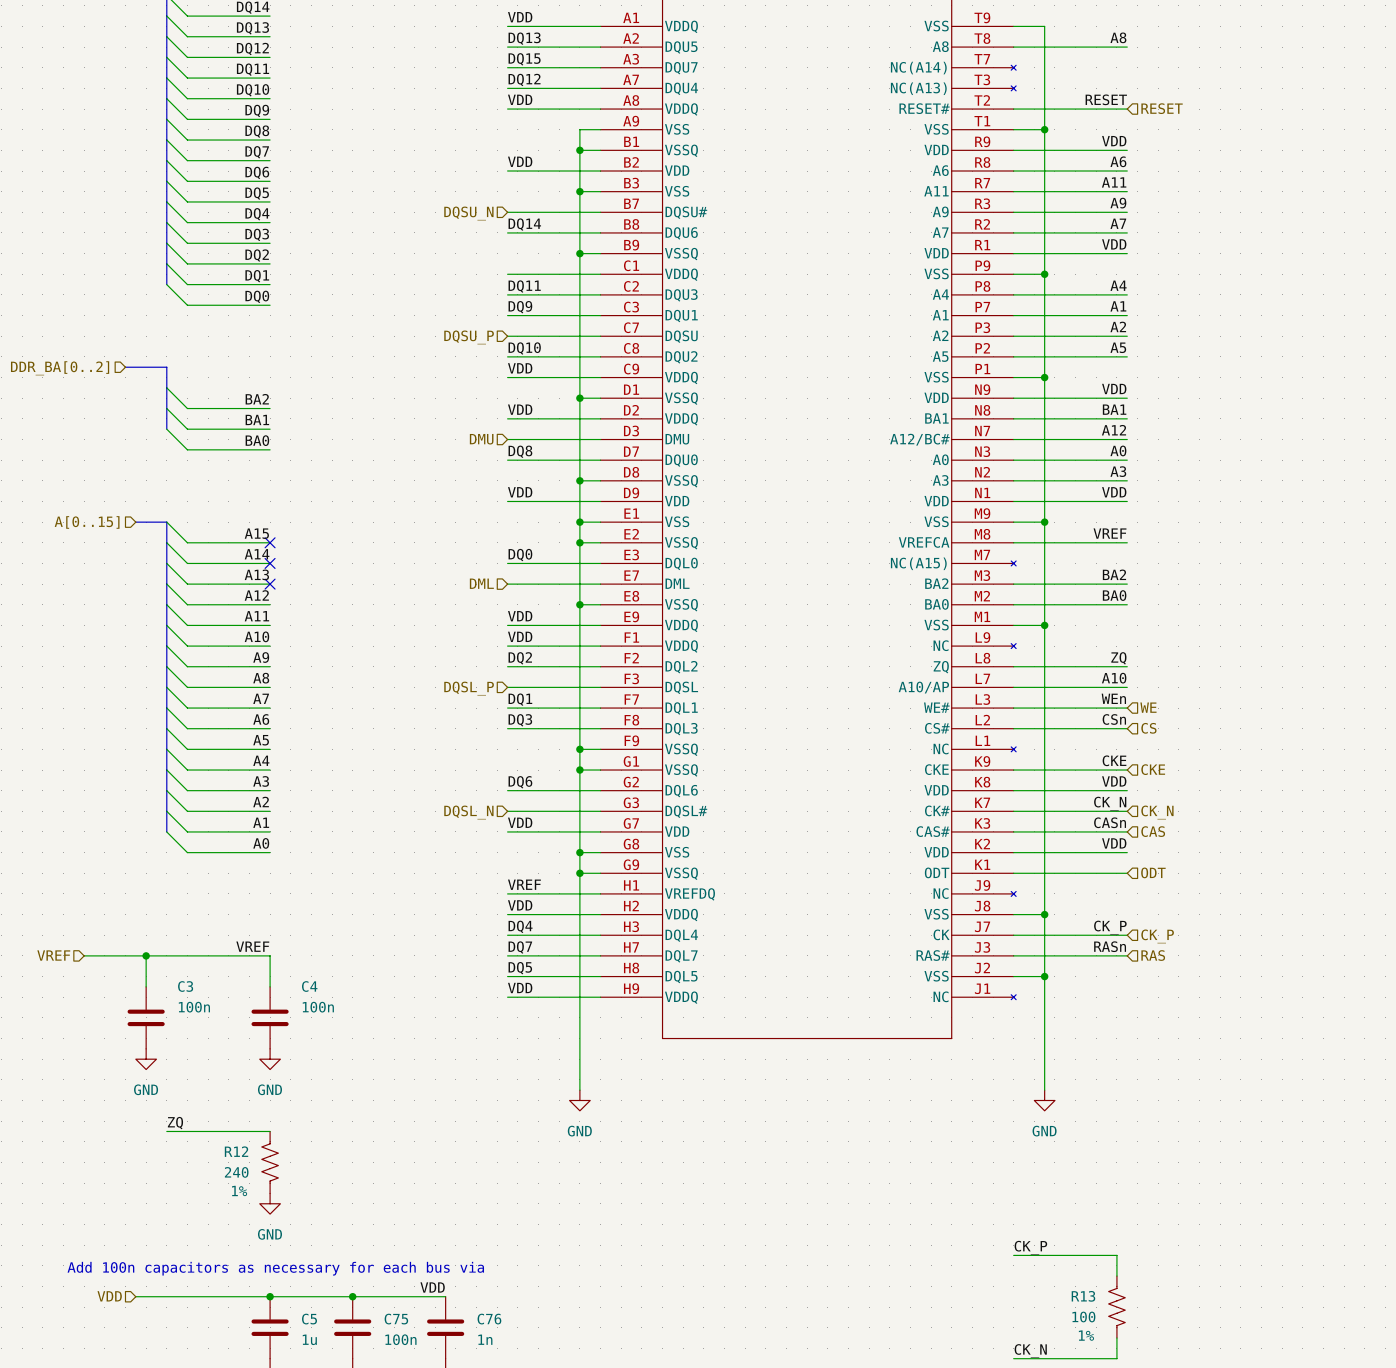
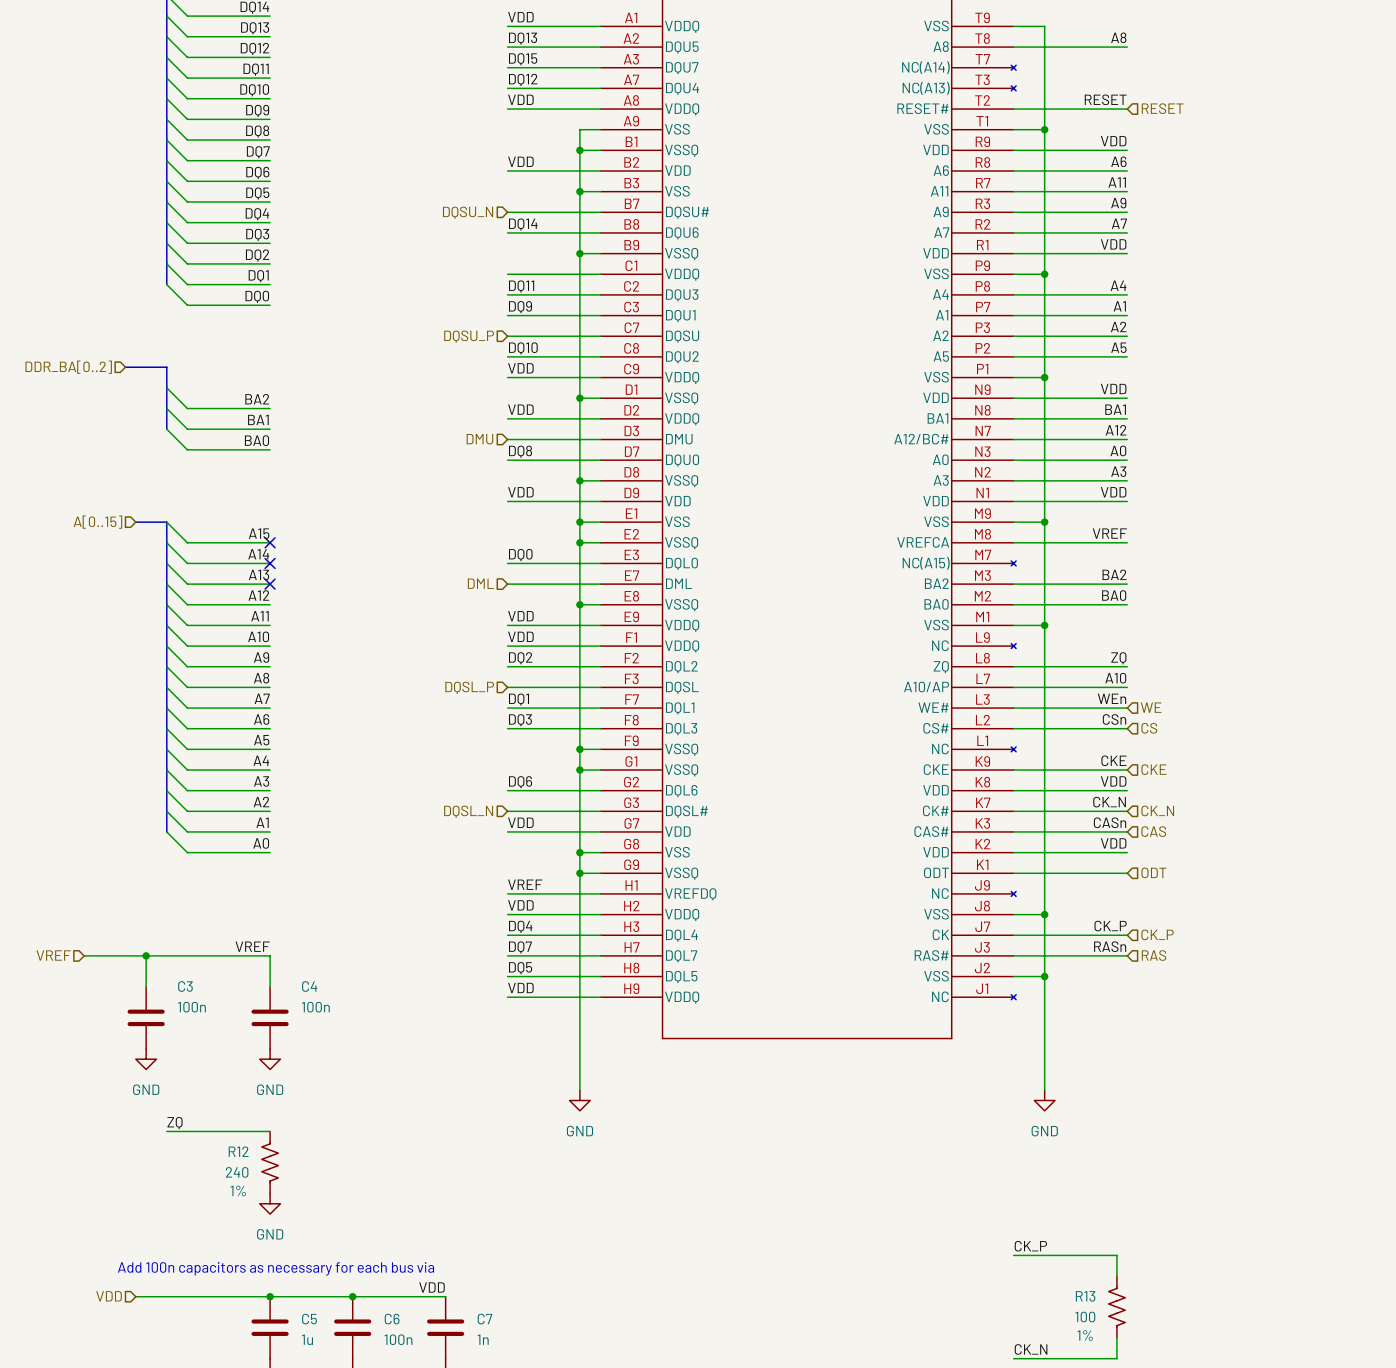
C75 name: C75 (396, 1319) -> C6 (392, 1319)
C76 name: C76 (489, 1319) -> C7 (484, 1319)

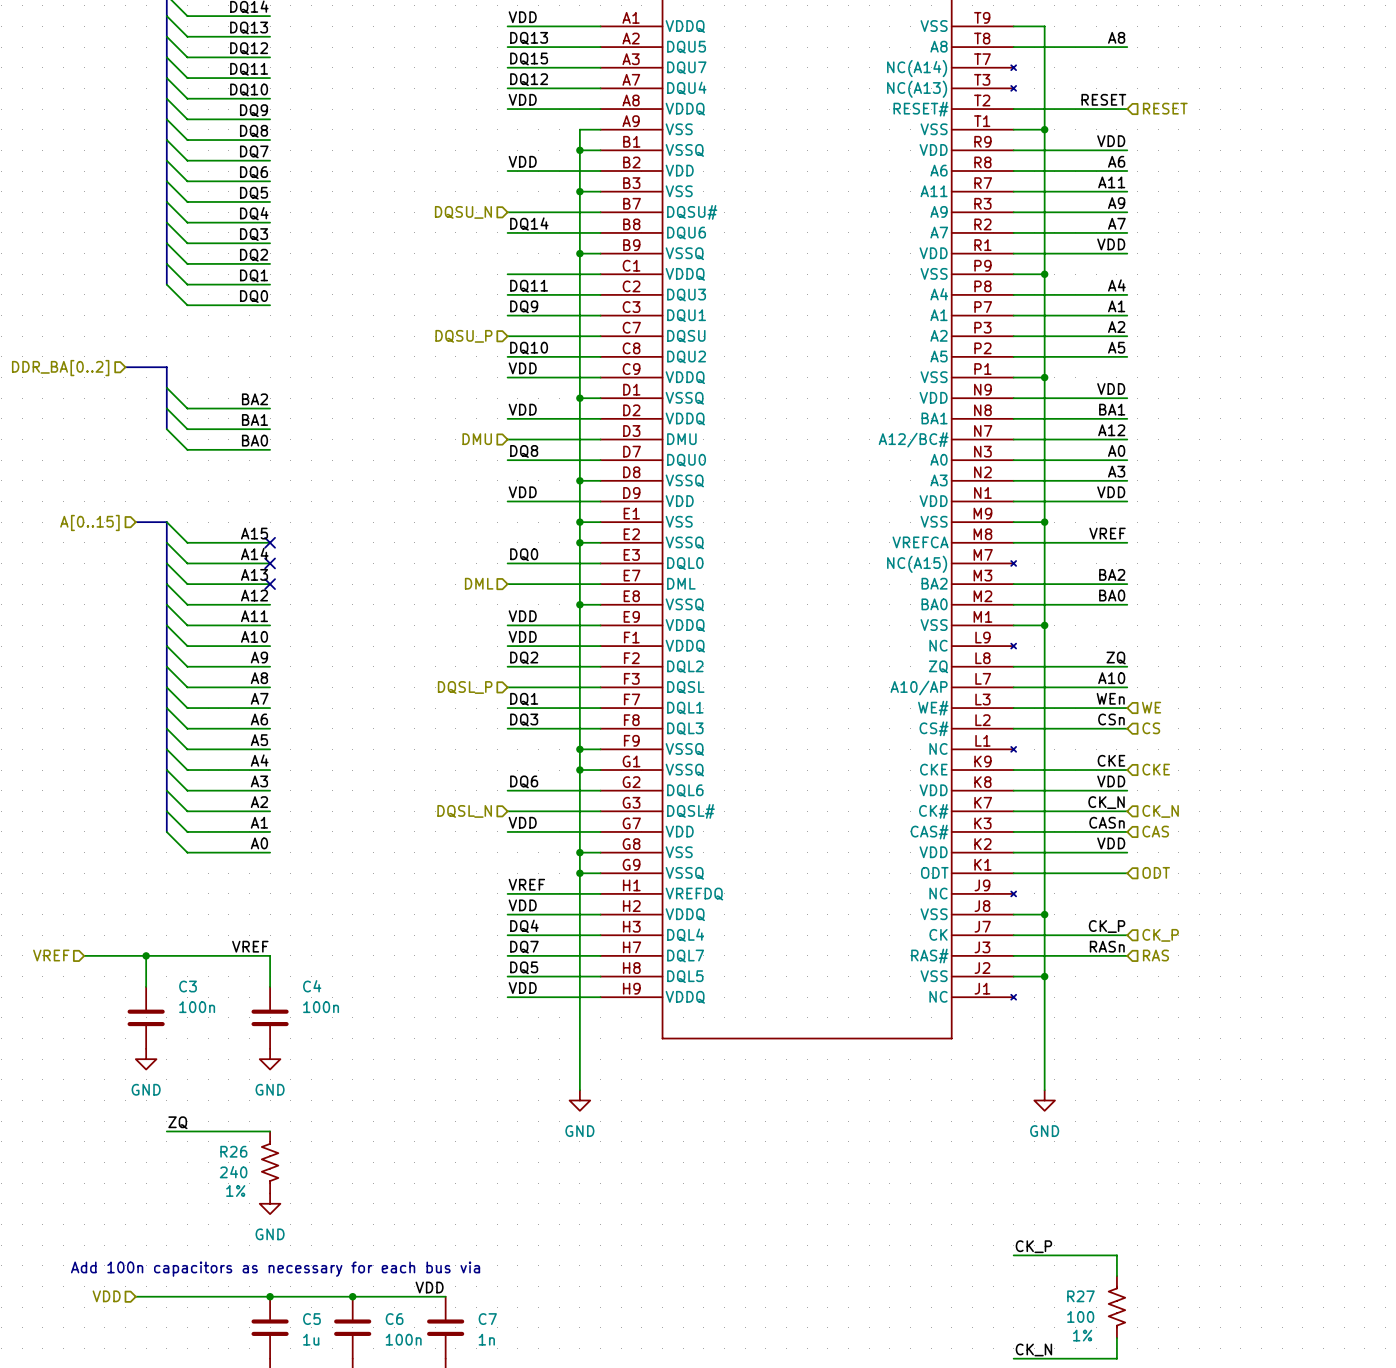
R12 name: R12 (238, 1151) -> R26 (233, 1151)
R13 name: R13 (1085, 1296) -> R27 (1080, 1296)

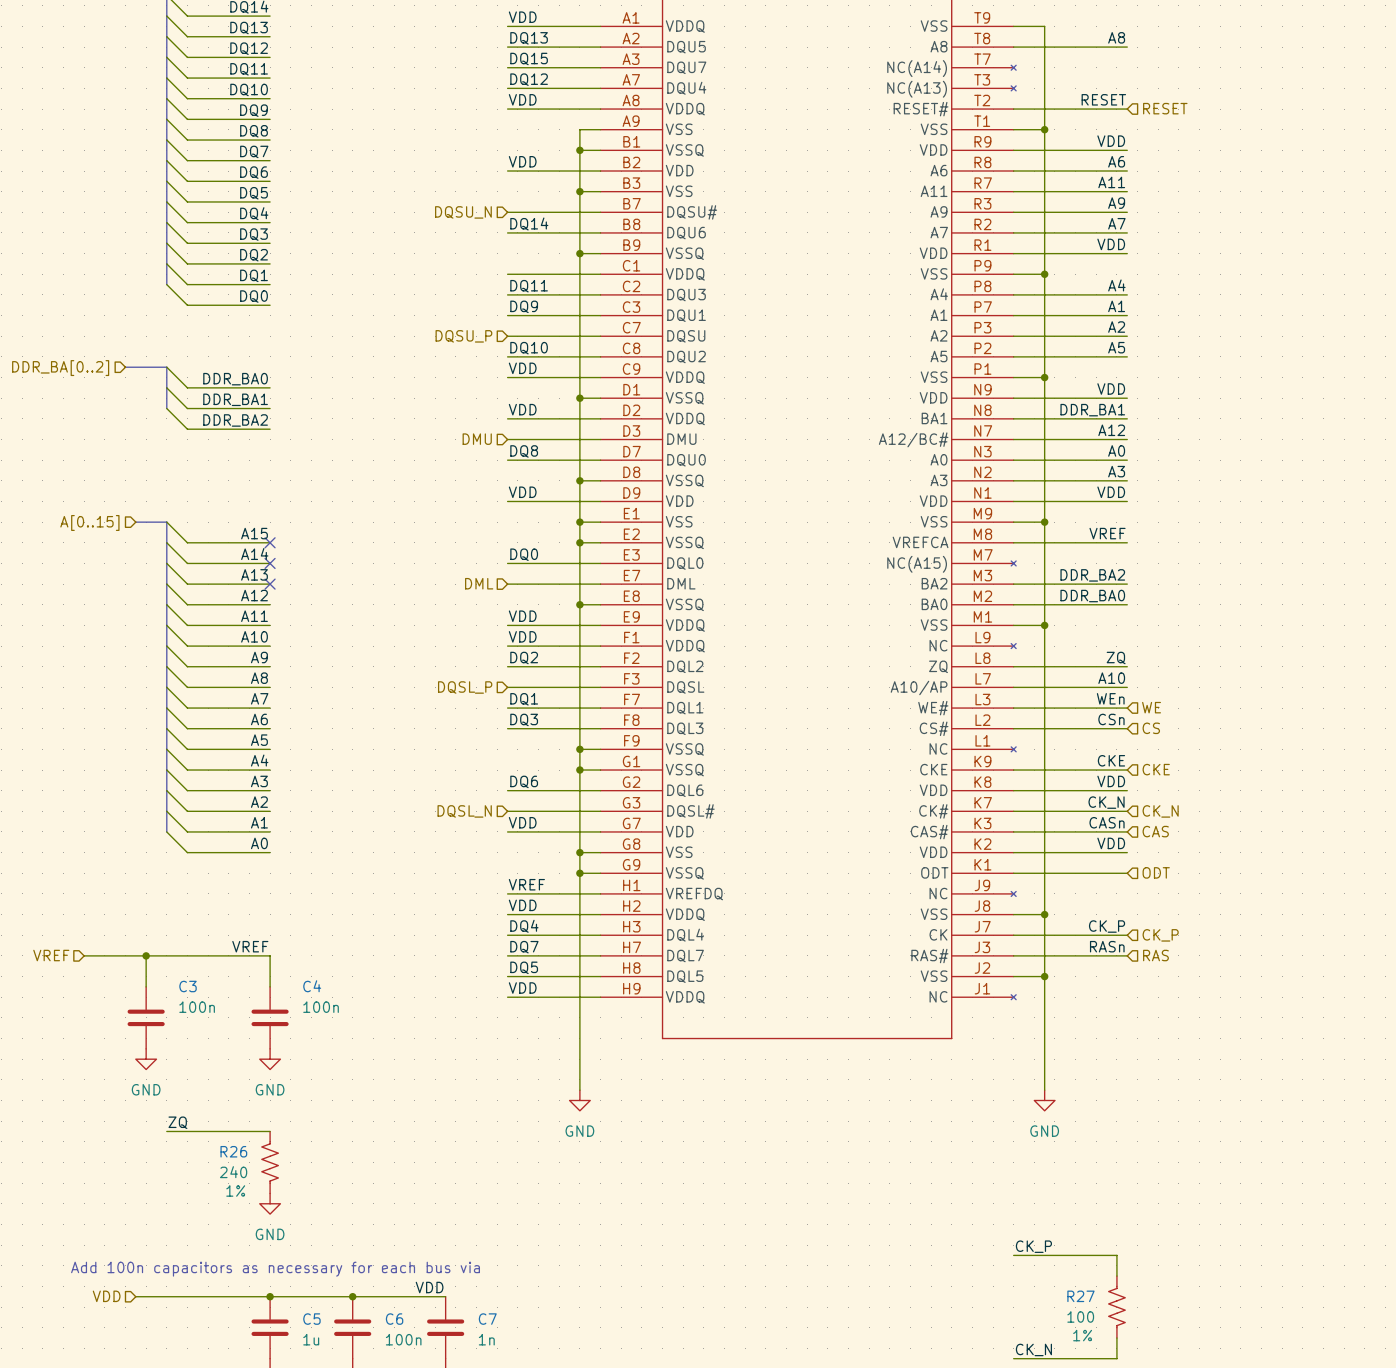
label: none -> DDR_BA0 (235, 379)
label: BA2 (254, 399) -> DDR_BA1 (235, 399)
bus: (166, 408) (166, 429) -> none
label: BA1 (1112, 409) -> DDR_BA1 (1092, 410)
label: BA1 (254, 419) -> DDR_BA2 (235, 420)
wire: (166, 429) (187, 449) (270, 449) -> (166, 367) (187, 387) (270, 387)
label: BA0 (254, 440) -> none
label: BA2 (1112, 574) -> DDR_BA2 (1092, 575)
label: BA0 (1112, 595) -> DDR_BA0 (1092, 596)

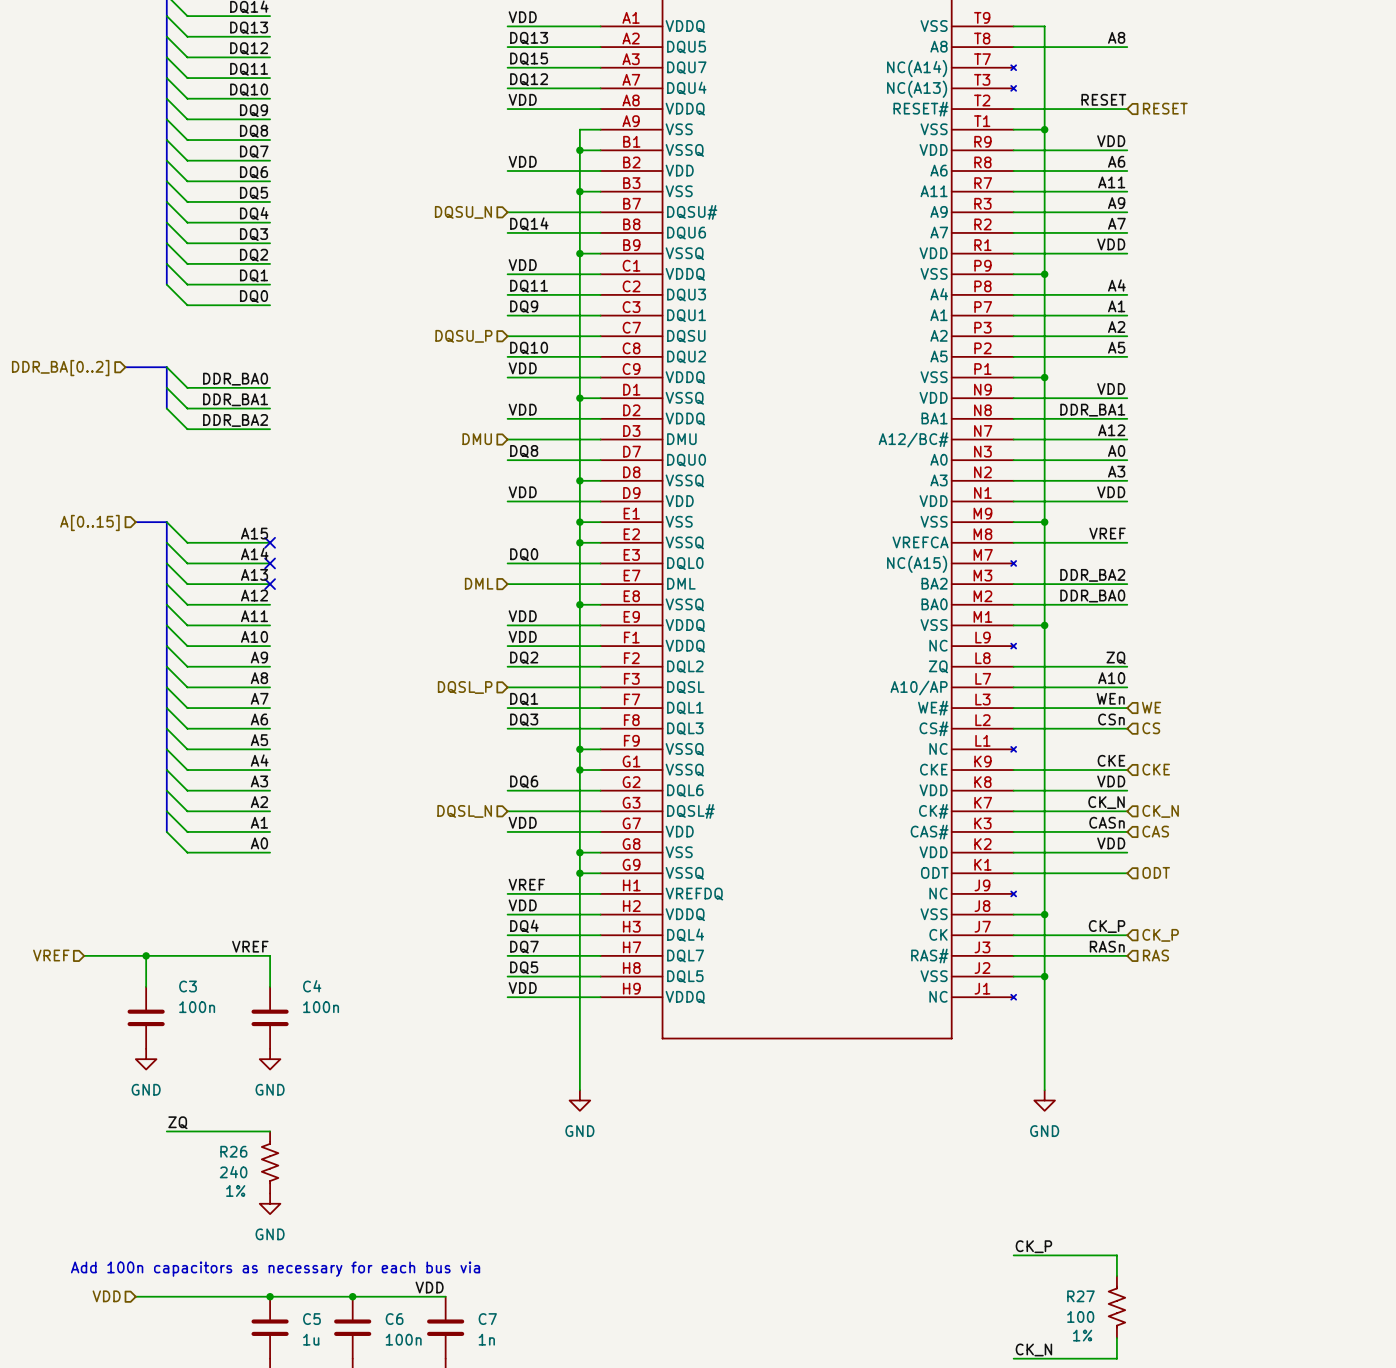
label: none -> VDD (522, 265)

